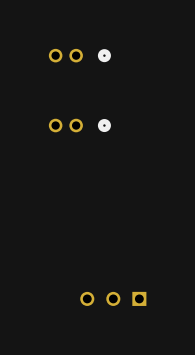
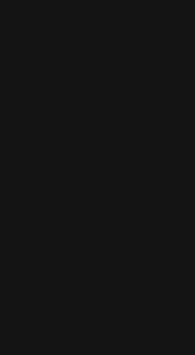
part: (79, 55) -> none
part: (79, 125) -> none
part: (113, 298) -> none

